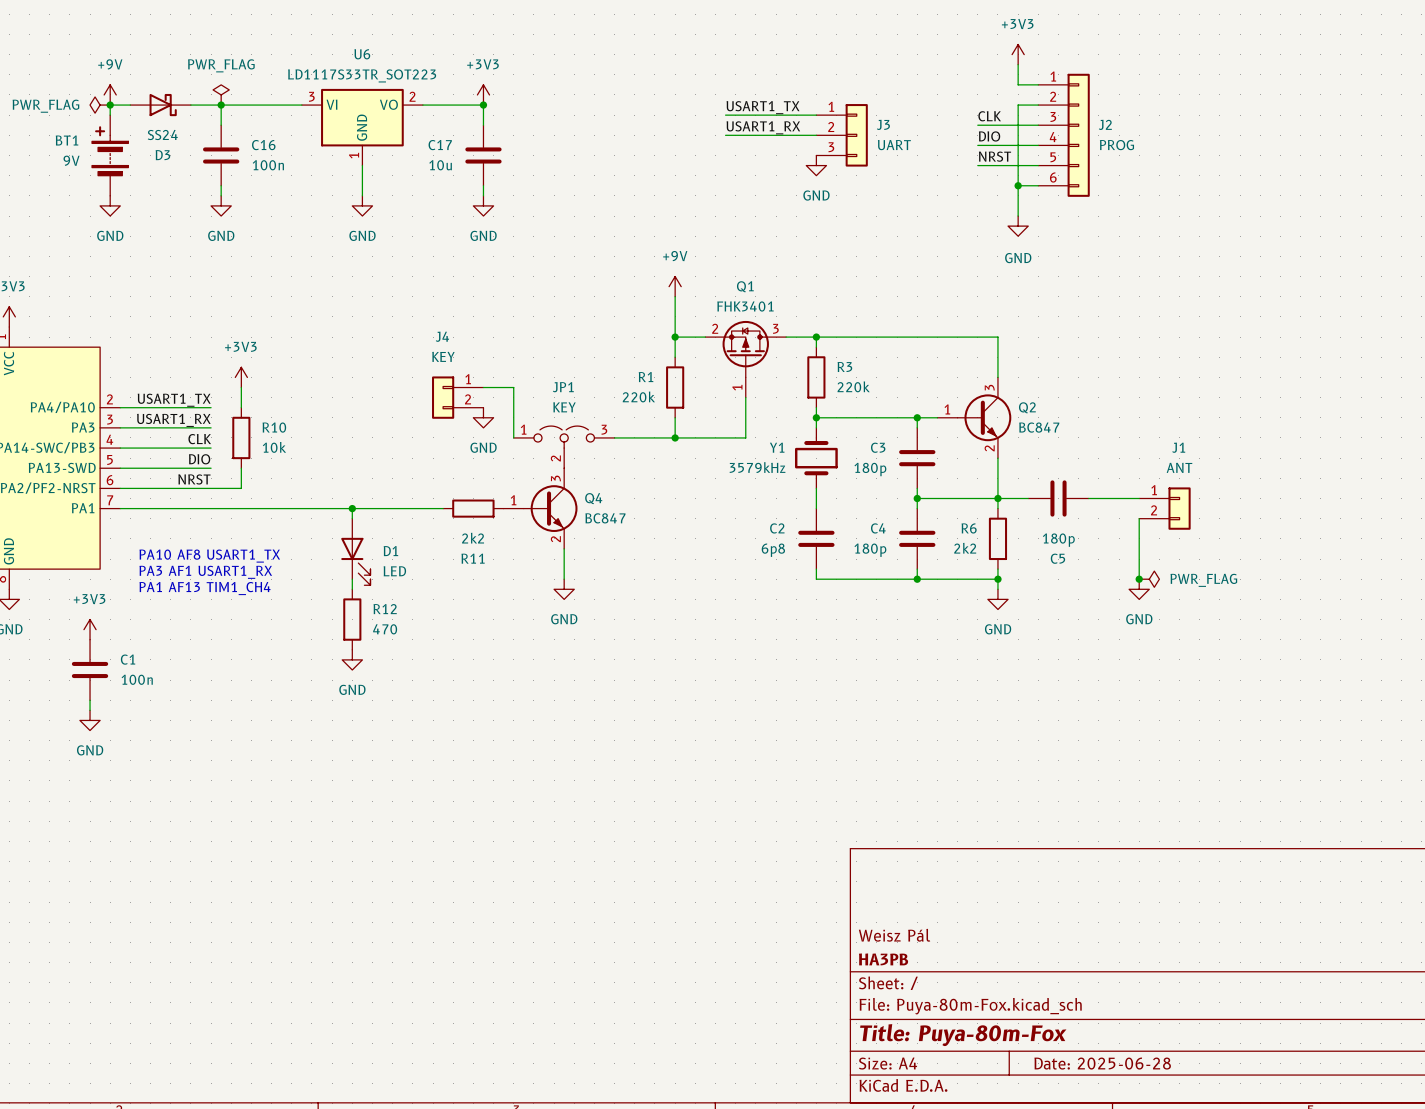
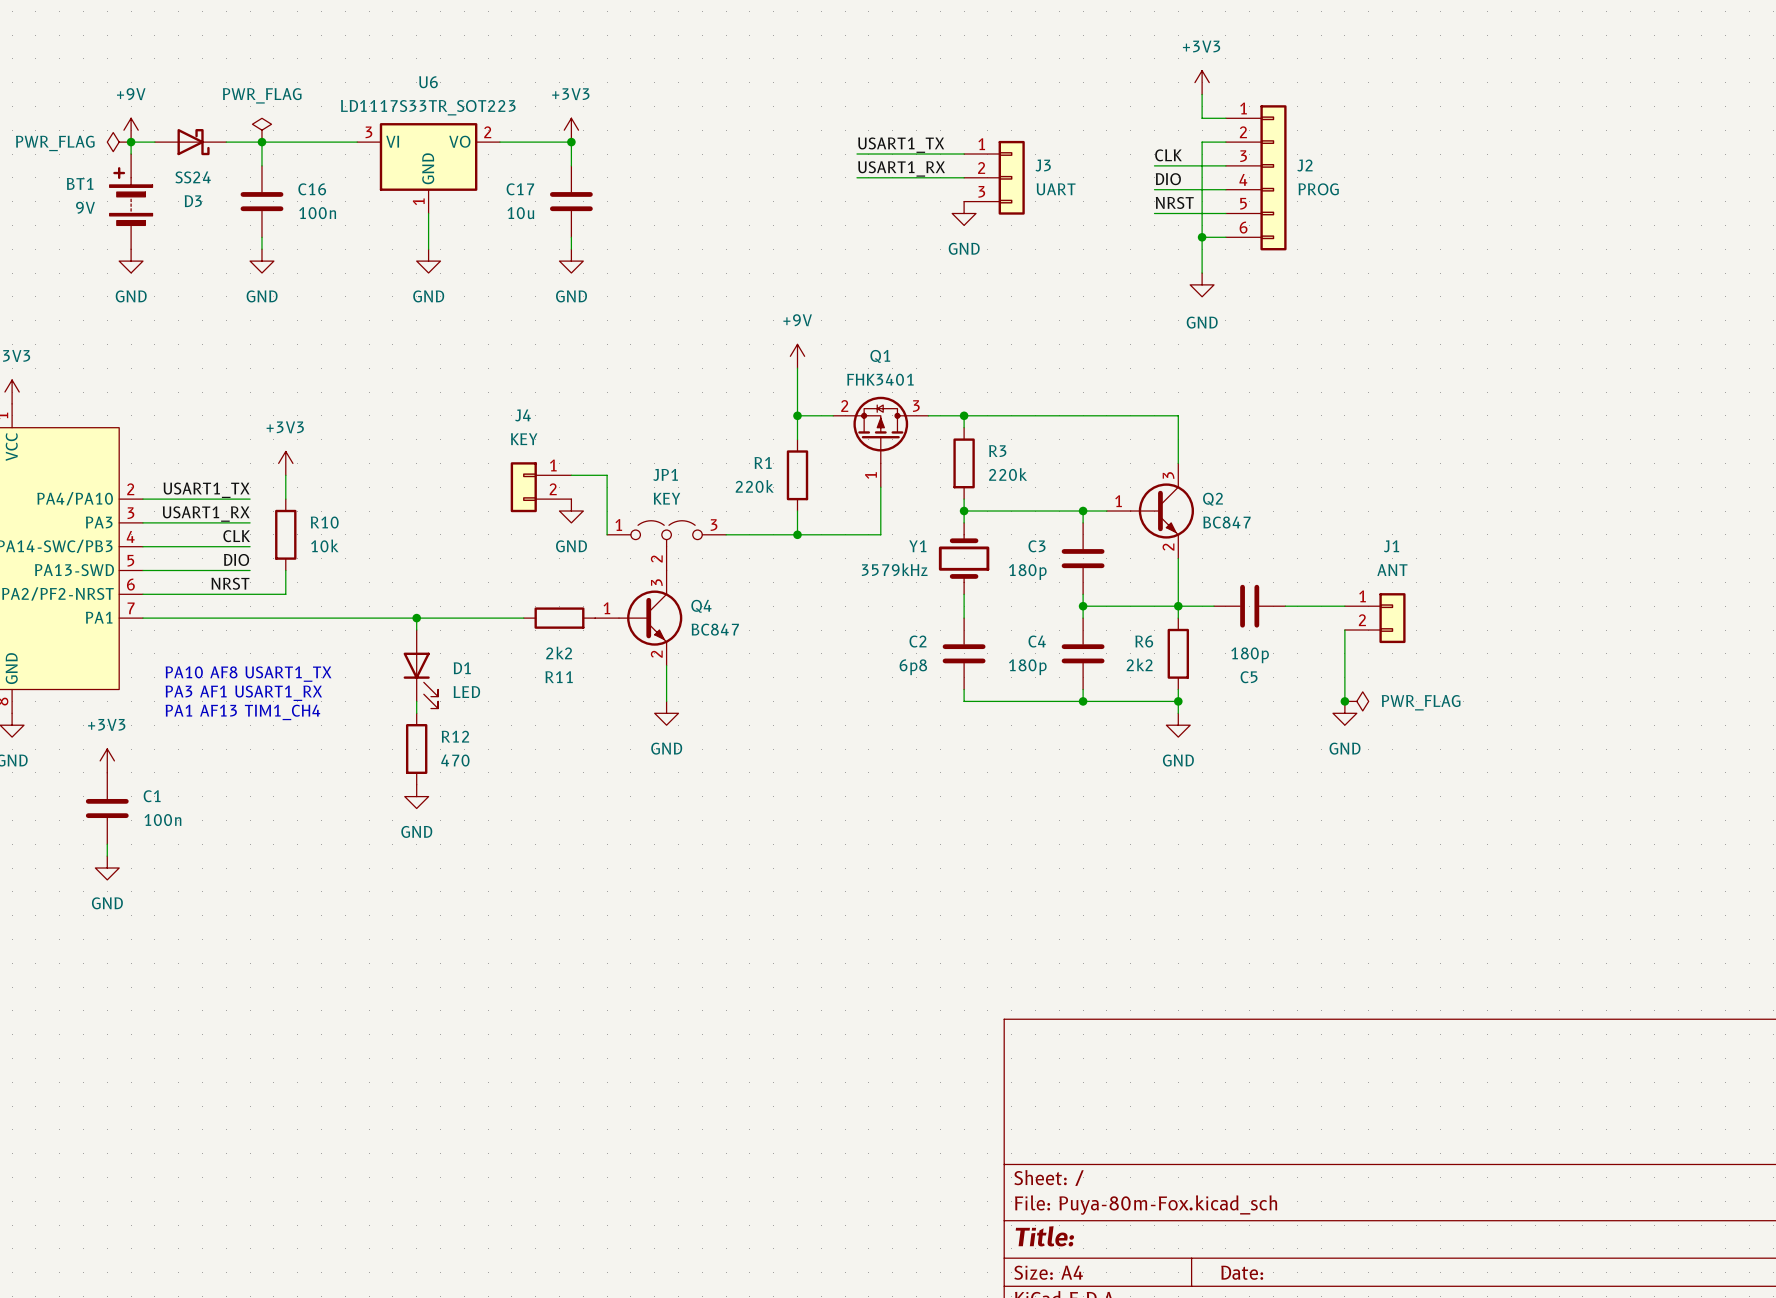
title block: Weisz Pál (894, 935) -> none
title block: HA3PB (883, 959) -> none
title block: Title: Puya-80m-Fox (963, 1035) -> Title: (1044, 1236)
title block: Date: 2025-06-28 (1102, 1063) -> Date: (1242, 1272)

